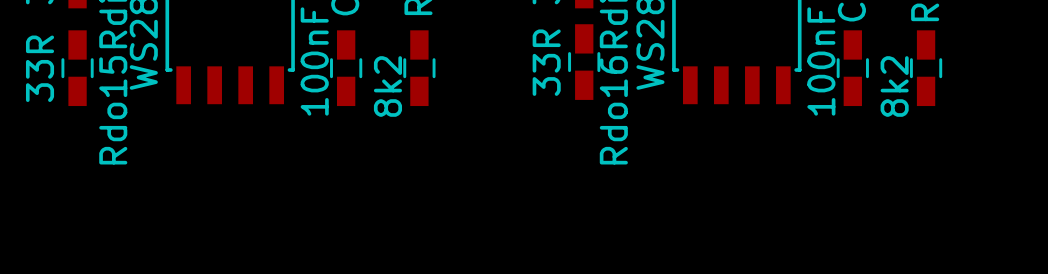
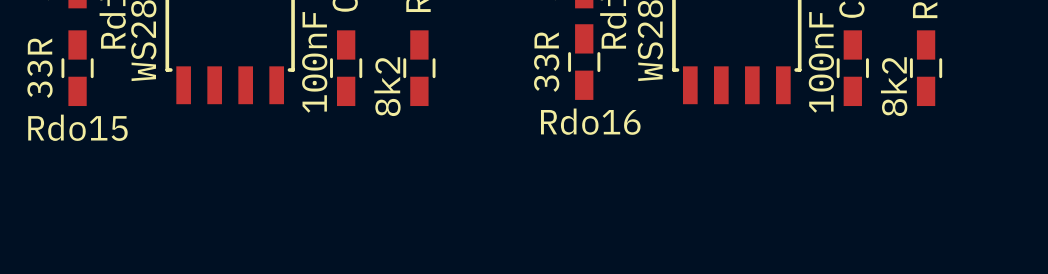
Rdo15 name rotation: 0° (113, 110) -> 90° clockwise (77, 127)
Rdo16 name rotation: 0° (613, 110) -> 90° clockwise (590, 121)

